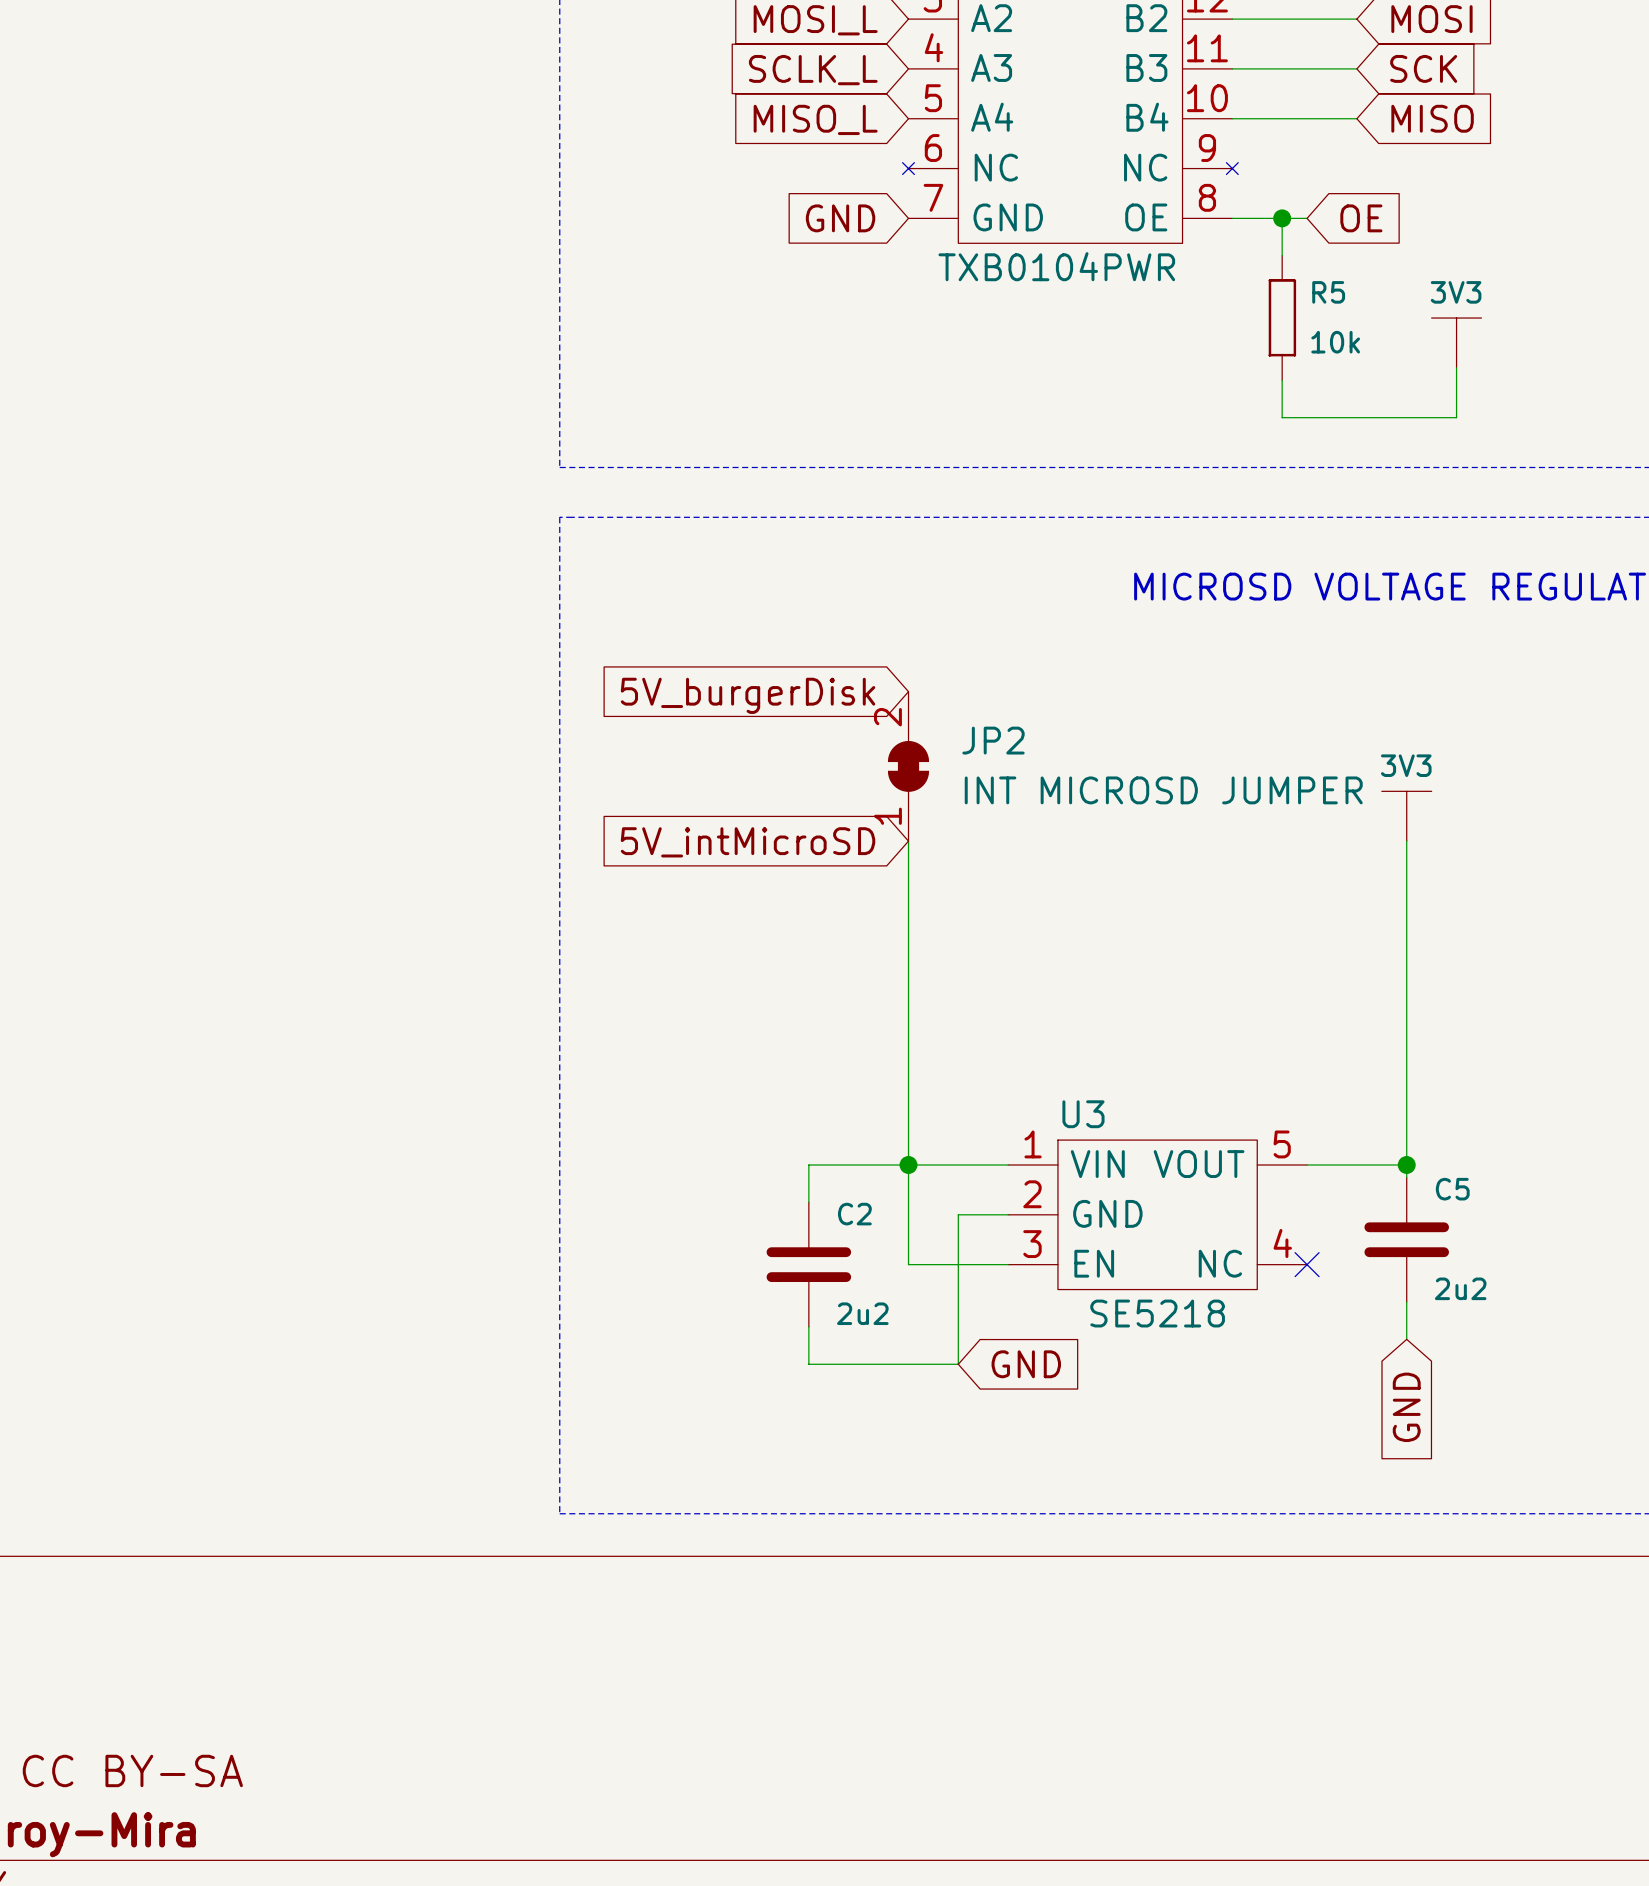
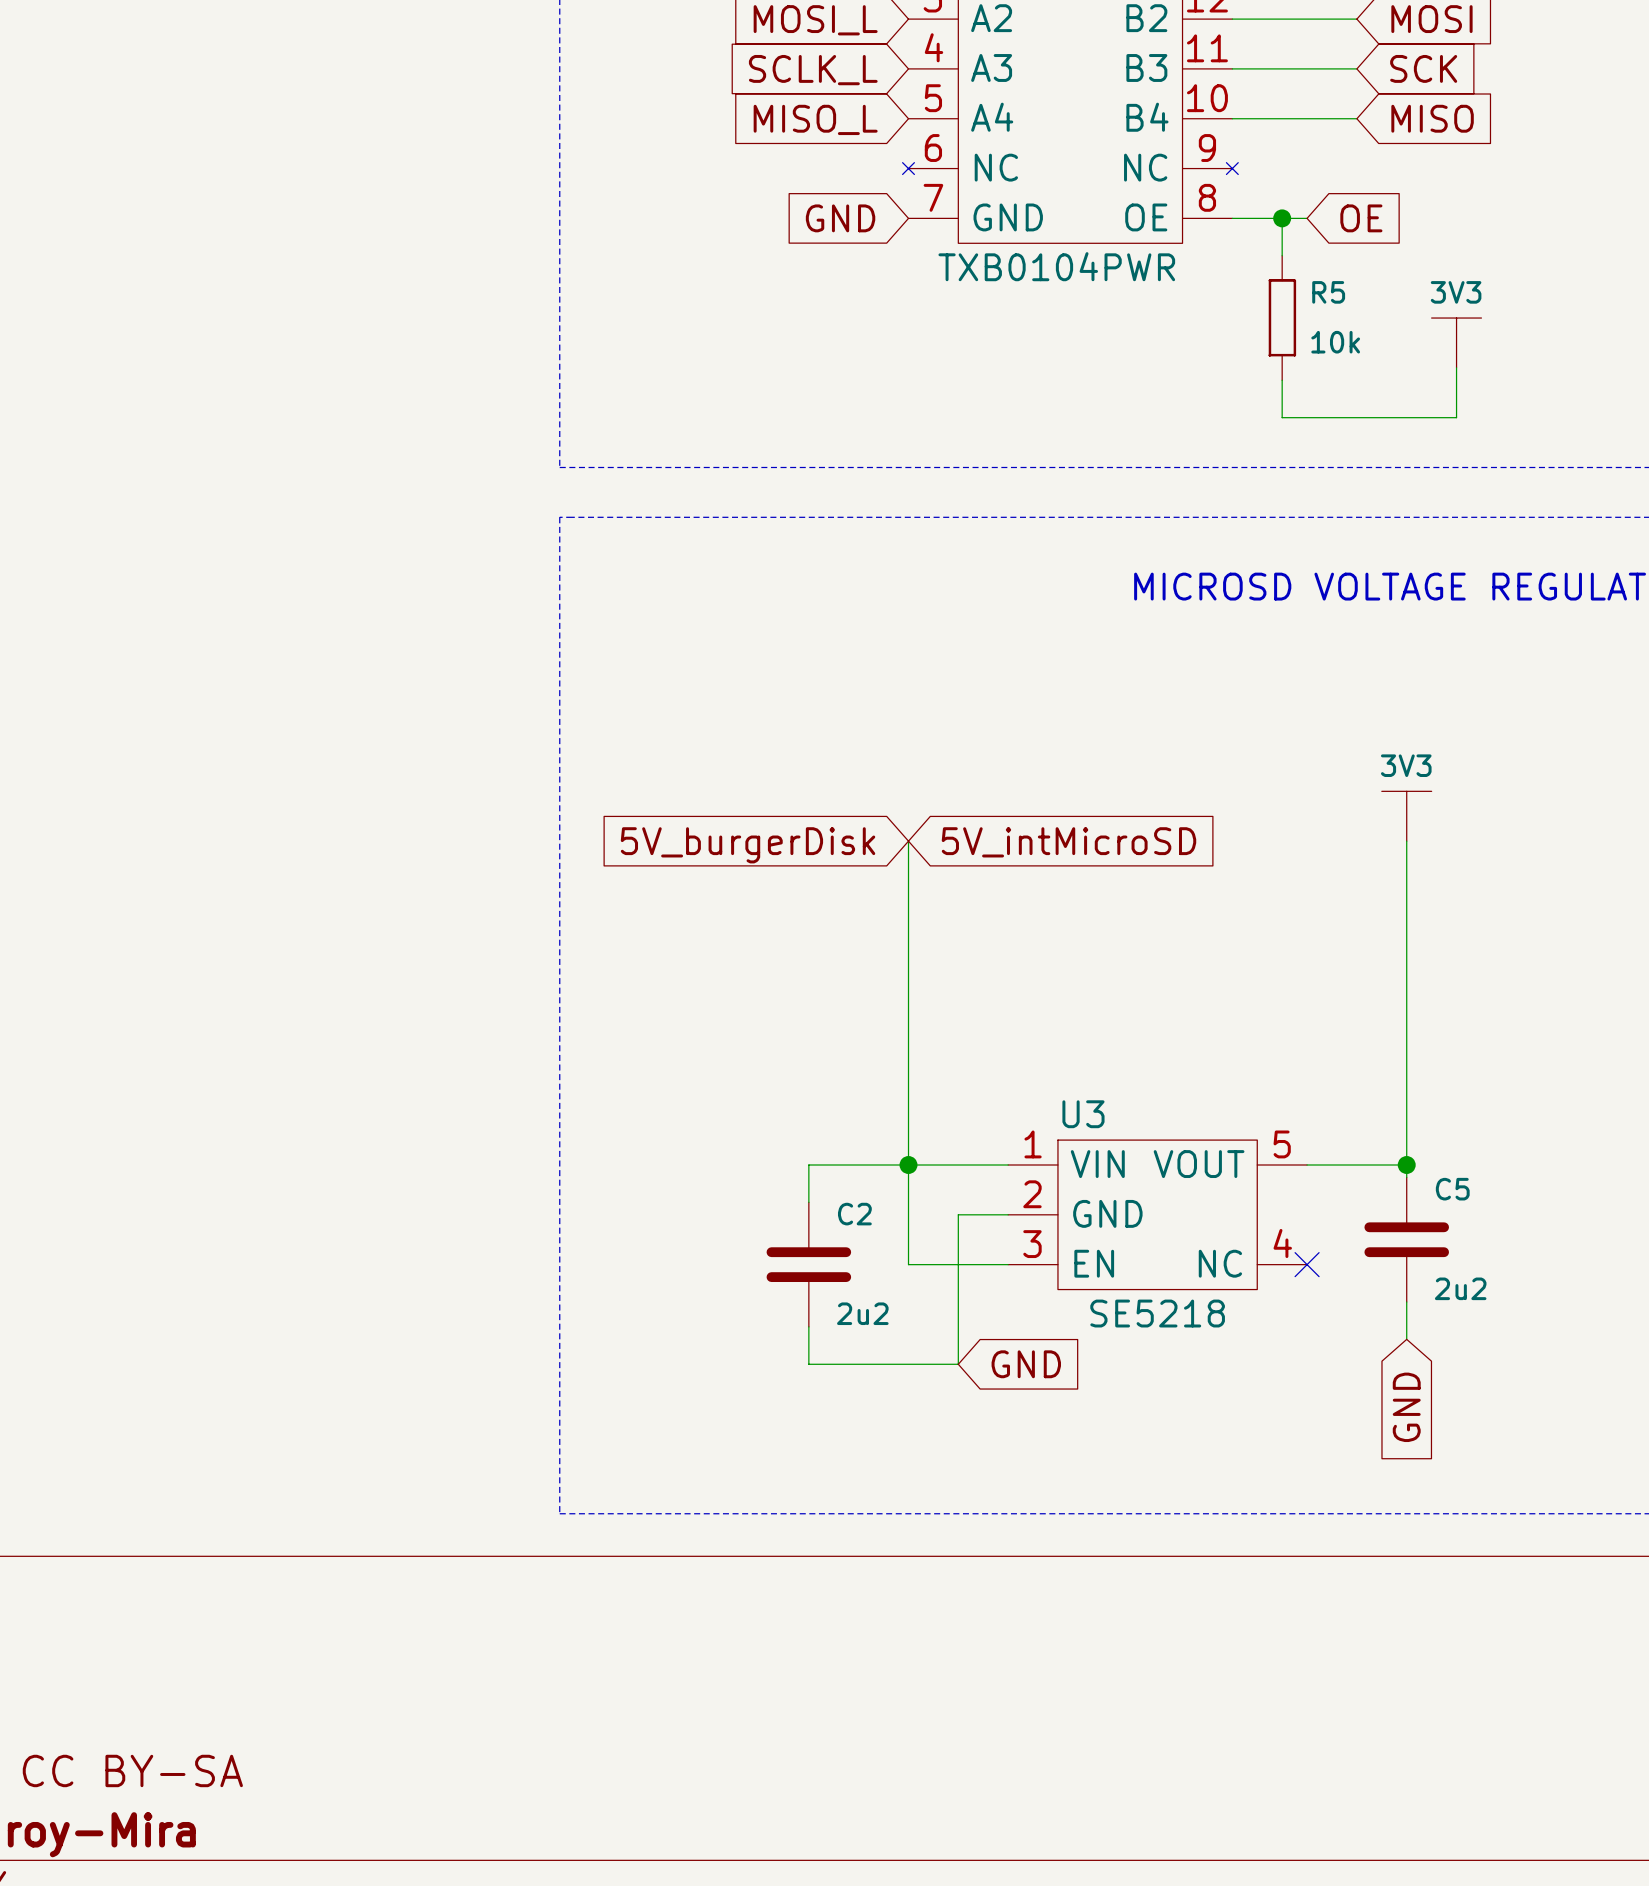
global label position: 5V_burgerDisk (748, 695) -> 5V_burgerDisk (748, 845)
JP2: INT MICROSD JUMPER (908, 766) -> none
global label rotation: 0° (748, 842) -> 180° (1068, 842)

